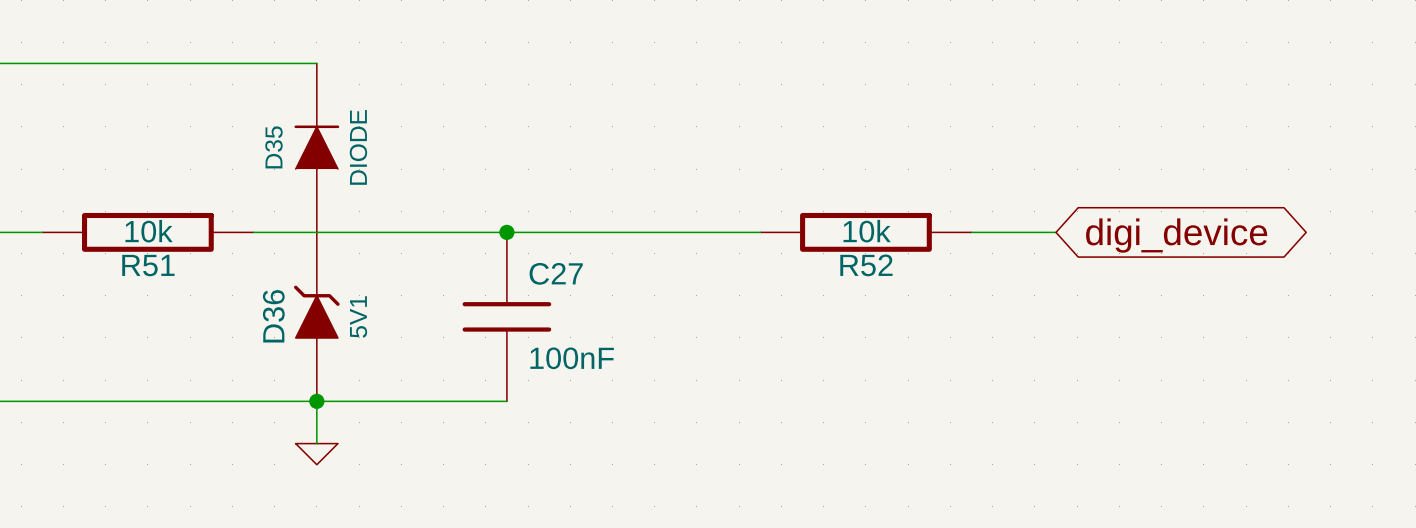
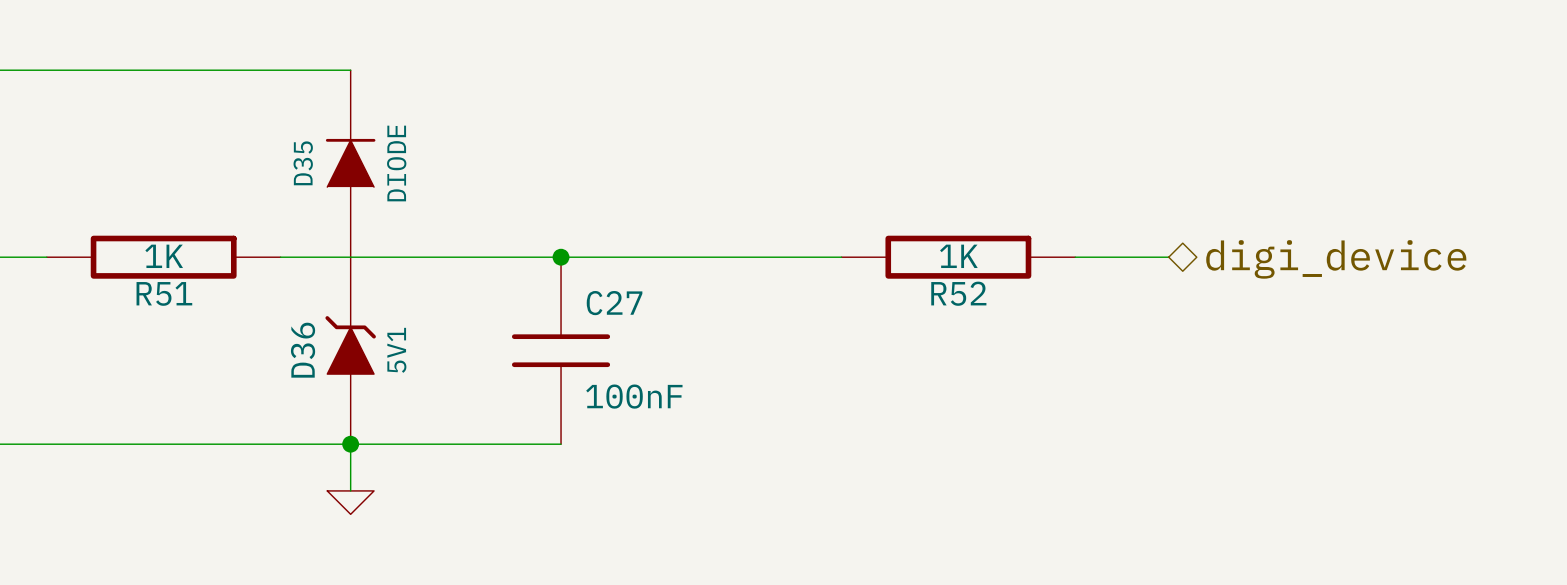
R51 value: 10k (149, 231) -> 1K (164, 256)
R52 value: 10k (867, 231) -> 1K (958, 256)
hierarchical label: none -> digi_device (1336, 259)
global label: digi_device (1176, 235) -> none

